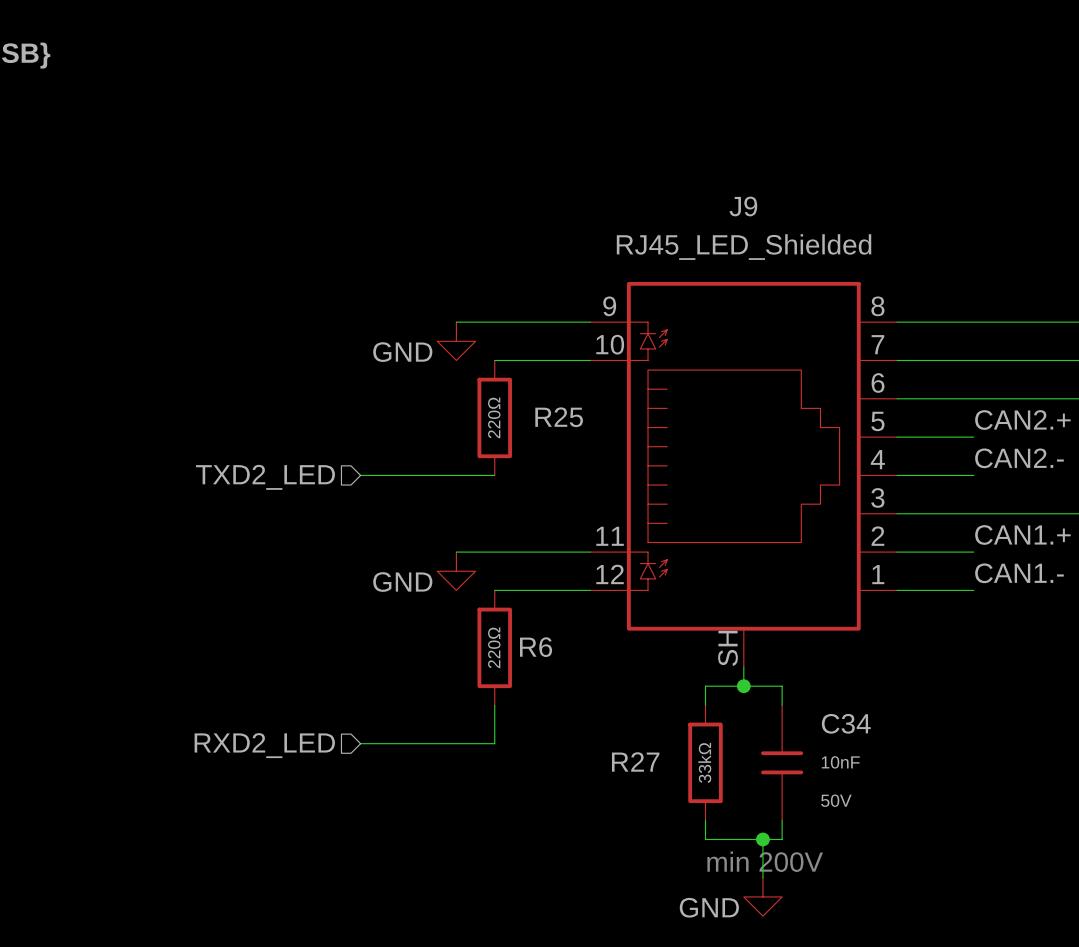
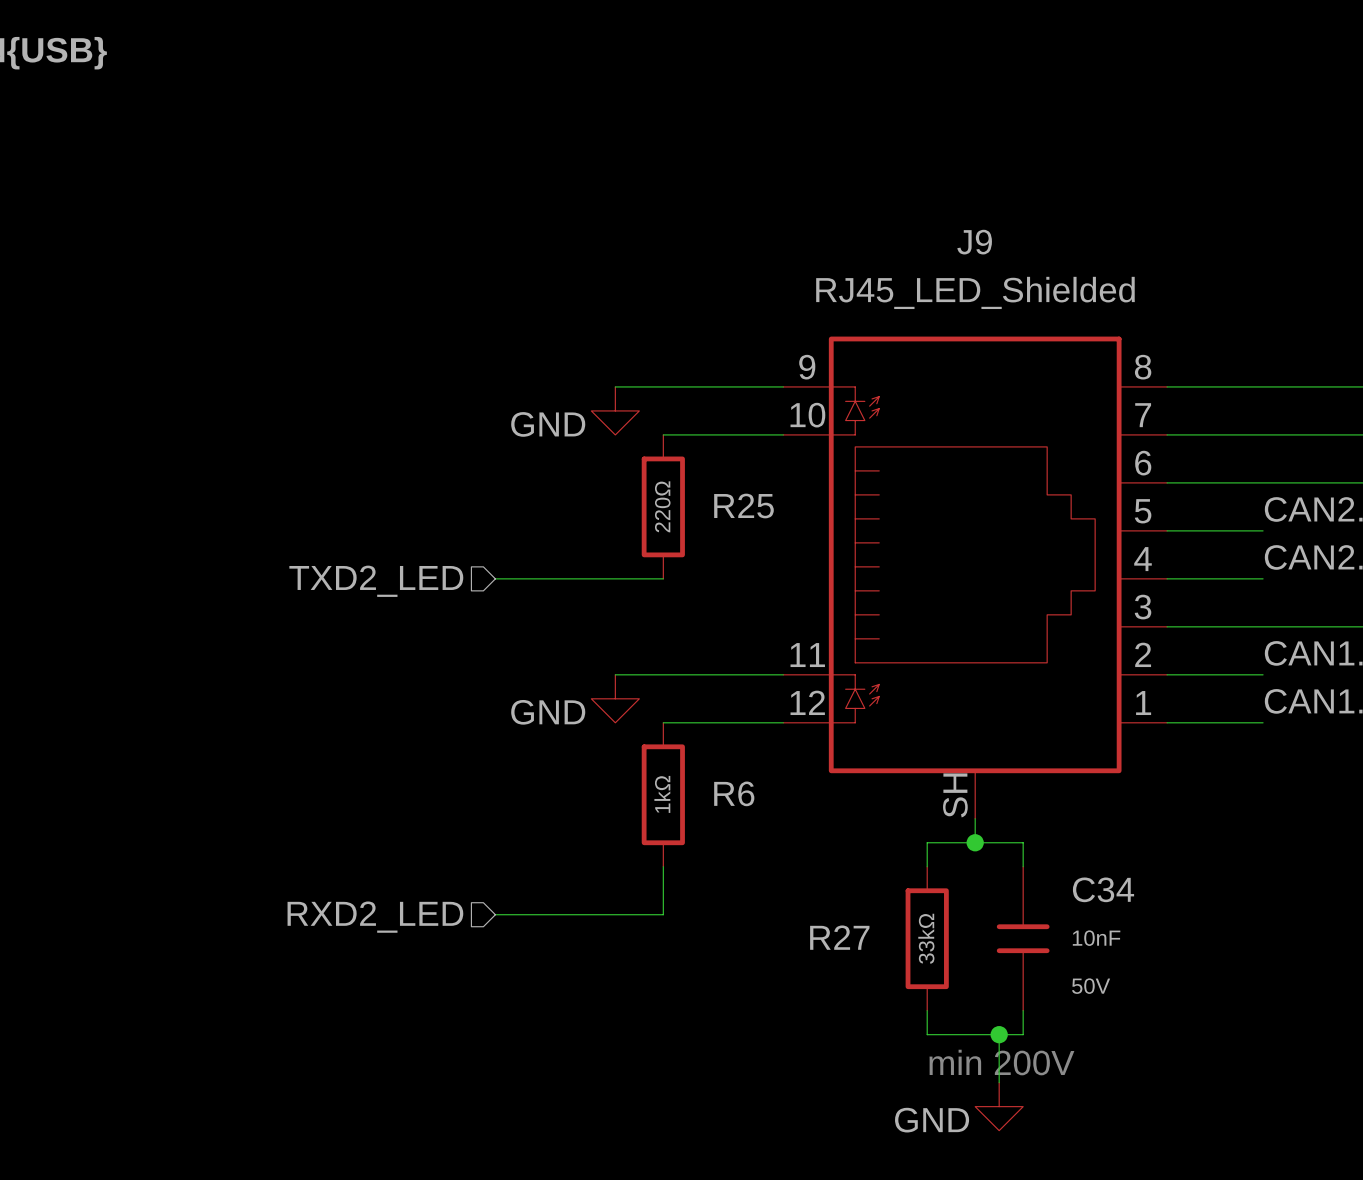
R6 value: 220Ω (494, 647) -> 1kΩ (662, 794)
R6 name position: R6 (536, 647) -> R6 (734, 793)

